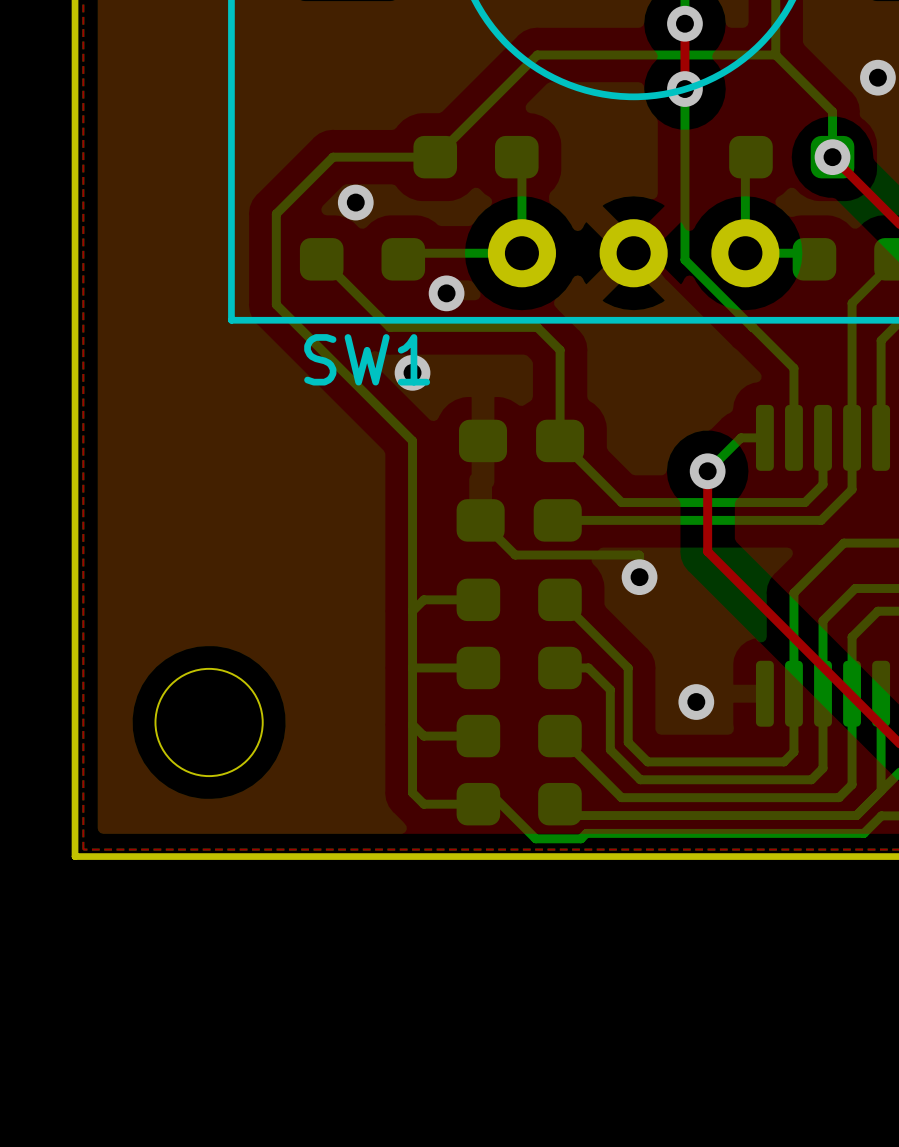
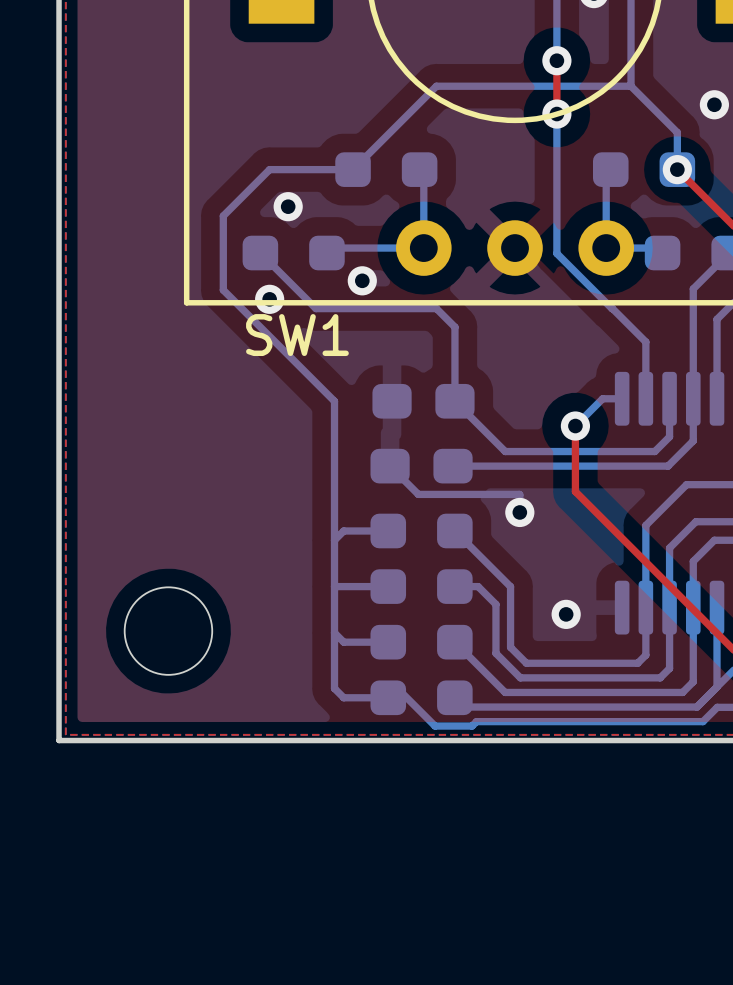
via position: (412, 372) -> (269, 299)

